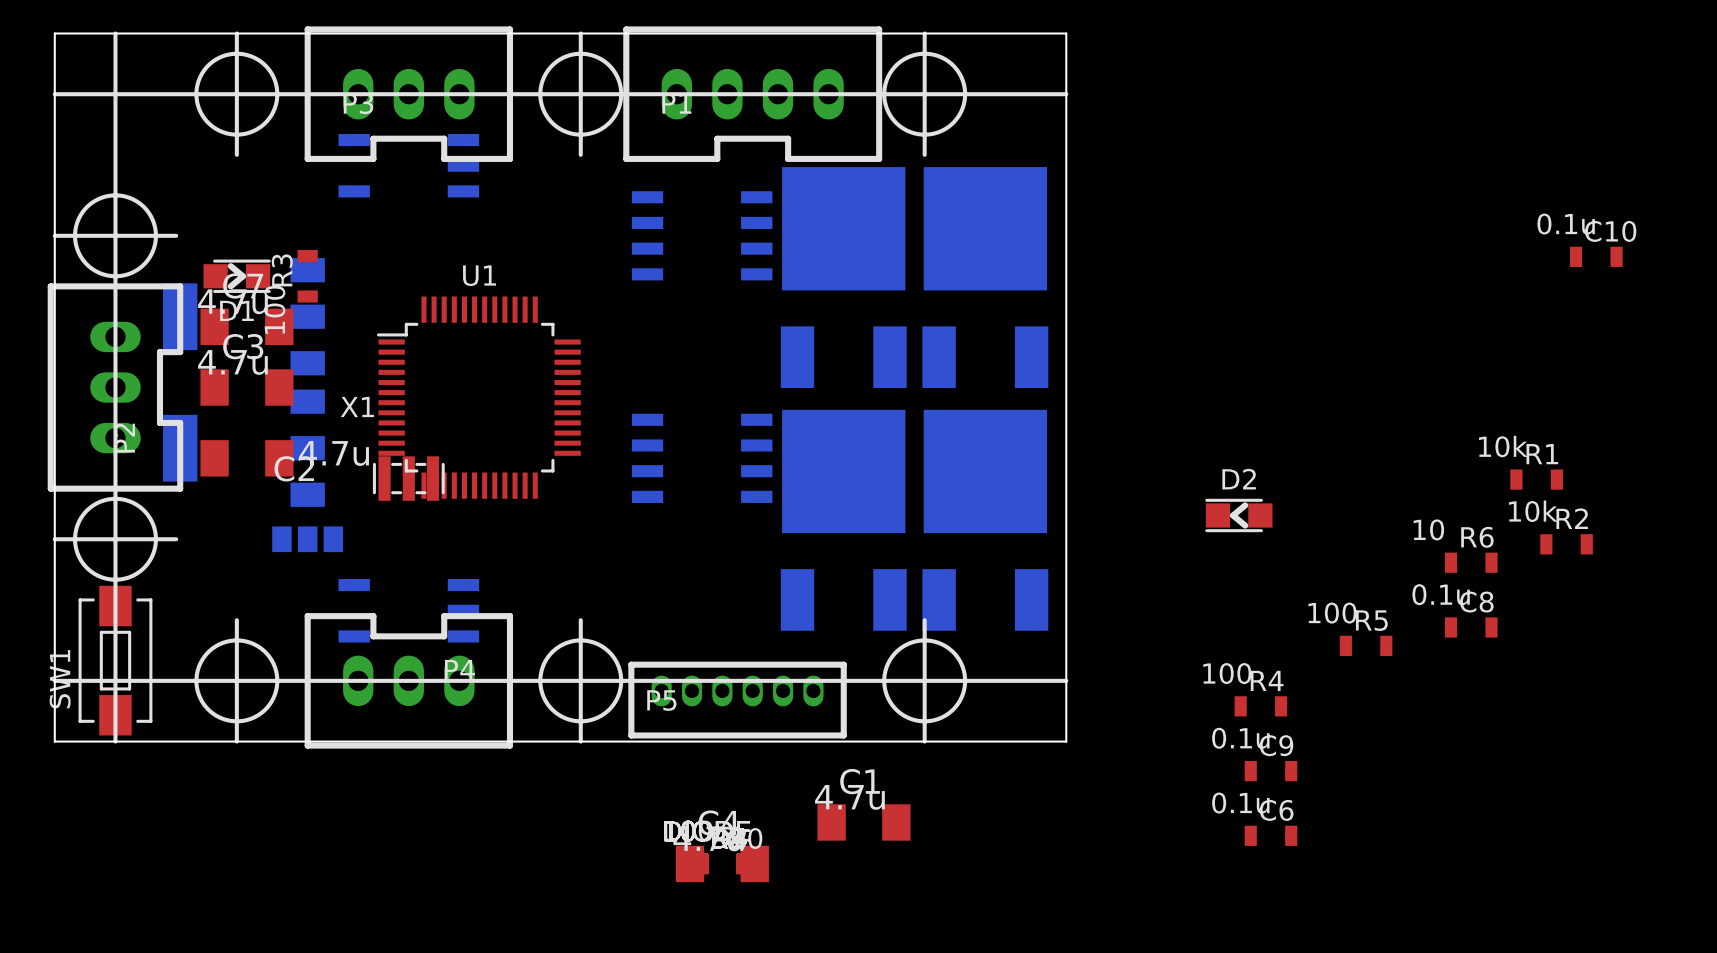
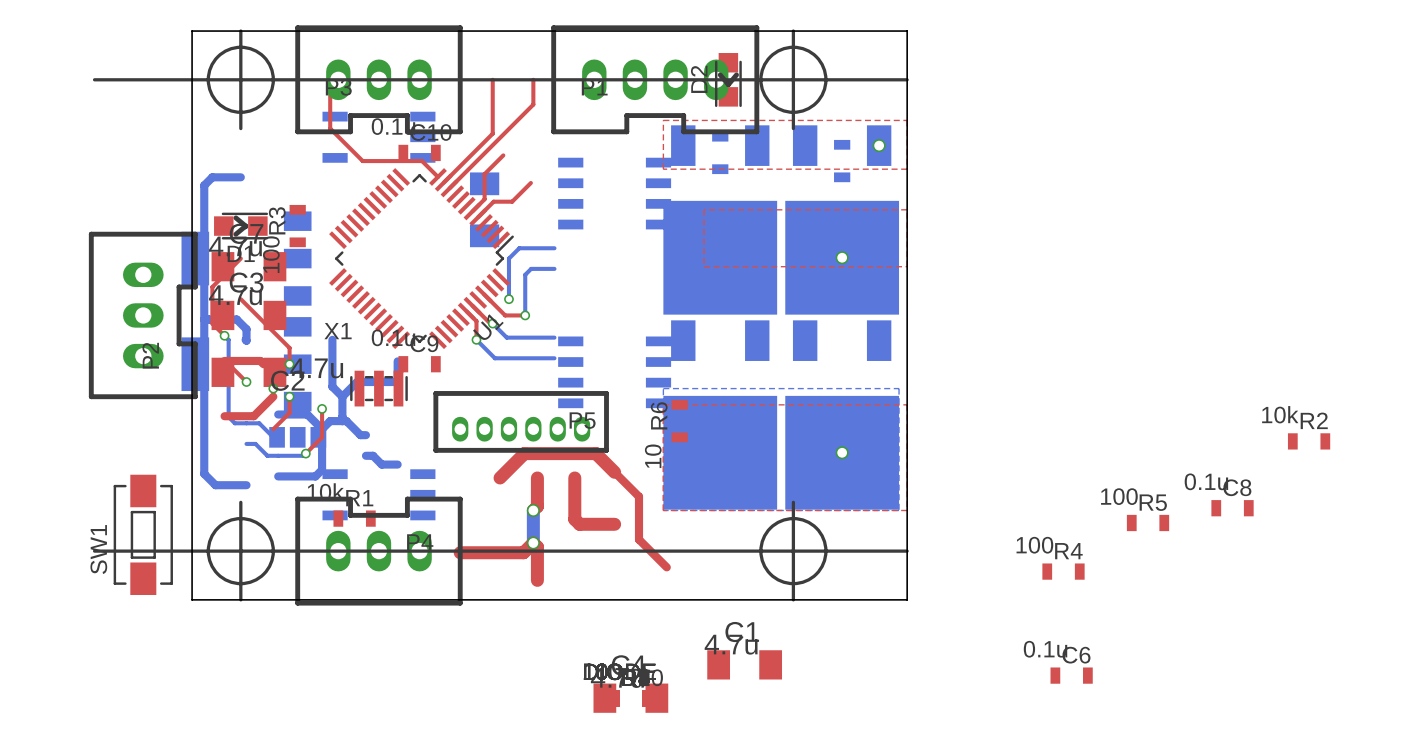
line: (115, 33) (115, 741) -> none
board edge: (176, 33) (54, 33) (54, 741) (176, 741) -> (192, 31) (192, 599)
line: (580, 33) (580, 154) -> none
drawing: [538, 51, 624, 137] -> none
top track: none -> (330, 79) (330, 128) (362, 161) (422, 161) (437, 176)
top track: none -> (492, 79) (492, 133) (443, 182)
top track: none -> (533, 79) (533, 104) (449, 188)
top zone outline: none -> (663, 120) (663, 169) (907, 169) (907, 120) (663, 120)
part footprint: [780, 167, 907, 389] -> [663, 125, 778, 315]
part footprint: [922, 167, 1049, 389] -> [785, 125, 900, 315]
via: none -> (879, 145)
part: none -> (720, 152)
top track: none -> (503, 155) (484, 174) (484, 199) (472, 211)
drawing: [73, 193, 158, 279] -> none
part: none -> (842, 161)
bottom track: none -> (240, 177) (212, 177) (204, 185) (204, 473) (215, 485) (246, 485)
top track: none -> (530, 182) (512, 201) (493, 201) (478, 217)
line: (54, 235) (176, 235) -> none
part: none -> (484, 209)
top zone outline: none -> (704, 209) (704, 266) (907, 266) (907, 209) (704, 209)
C10 position: (1596, 256) -> (419, 152)
bottom track: none -> (554, 248) (519, 248) (508, 258) (508, 299)
via: none -> (842, 257)
top track: none -> (240, 258) (212, 287) (212, 323) (224, 335)
bottom track: none -> (554, 268) (531, 268) (525, 274) (525, 315)
top track: none -> (483, 294) (505, 315) (525, 315)
top track: none -> (240, 299) (289, 347) (289, 364)
via: none -> (508, 299)
top track: none -> (472, 305) (490, 323) (492, 323)
top track: none -> (466, 311) (476, 321) (476, 339)
via: none -> (525, 315)
bottom track: none -> (204, 319) (236, 319) (246, 329) (245, 339)
U1 rotation: 0° (478, 397) -> 135° clockwise (421, 258)
bottom track: none -> (492, 323) (506, 337) (554, 337)
via: none -> (492, 323)
part footprint: [780, 409, 907, 631] -> [663, 320, 778, 510]
part footprint: [922, 409, 1049, 631] -> [785, 320, 900, 510]
bottom track: none -> (224, 335) (228, 339) (228, 417) (234, 423) (259, 423) (271, 435) (278, 435)
via: none -> (224, 335)
bottom track: none -> (332, 339) (332, 386) (342, 396)
bottom track: none -> (476, 339) (494, 358) (554, 358)
via: none -> (476, 339)
bottom track: none -> (397, 361) (397, 382) (357, 382) (342, 396)
top track: none -> (263, 364) (260, 360) (224, 360) (246, 382)
via: none -> (289, 364)
via: none -> (246, 382)
top track: none -> (273, 388) (273, 396) (253, 416) (224, 416)
via: none -> (273, 388)
bottom zone outline: none -> (663, 388) (899, 388) (899, 510) (663, 510) (663, 388)
R1 position: (1536, 479) -> (354, 518)
top track: none -> (289, 396) (289, 412) (273, 429)
via: none -> (289, 396)
bottom track: none -> (342, 396) (342, 421)
drawing: [73, 496, 158, 582] -> none
top zone outline: none -> (663, 404) (663, 510) (907, 510) (907, 404) (663, 404)
top track: none -> (322, 408) (322, 437) (305, 453)
via: none -> (322, 408)
bottom track: none -> (278, 414) (307, 414) (322, 429)
D2 rotation: 0° (1238, 515) -> 90° counterclockwise (728, 80)
D2 position: (1238, 515) -> (728, 80)
bottom track: none -> (322, 429) (330, 421) (346, 421) (360, 435) (365, 435)
bottom track: none -> (322, 429) (322, 469) (315, 476) (278, 476)
R6 value position: 10 (1428, 529) -> 10 (653, 456)
line: (54, 539) (176, 539) -> none
bottom track: none -> (246, 443) (255, 443) (267, 455) (303, 455) (305, 453)
via: none -> (842, 452)
via: none -> (305, 453)
bottom track: none -> (365, 455) (373, 455) (381, 464) (397, 464)
R6 rotation: 0° (1471, 562) -> 90° clockwise (679, 421)
R6 position: (1471, 562) -> (679, 421)
top track: none -> (500, 477) (524, 453) (595, 453) (639, 496) (639, 539) (666, 567)
top track: none -> (537, 477) (537, 506) (533, 510)
top track: none -> (574, 477) (574, 519) (579, 524) (614, 524)
line: (580, 620) (580, 741) -> none
bottom track: none -> (533, 510) (533, 542)
via: none -> (533, 510)
drawing: [538, 638, 624, 724] -> none
via: none -> (533, 542)
top track: none -> (460, 552) (523, 552) (533, 542) (537, 547) (537, 580)
P5 rotation: 0° (737, 700) -> 180° (521, 421)
P5 position: (737, 700) -> (521, 421)
C9 position: (1271, 771) -> (419, 364)

